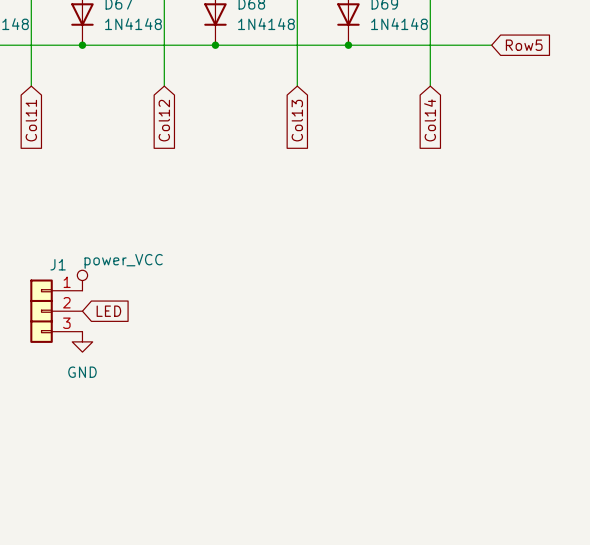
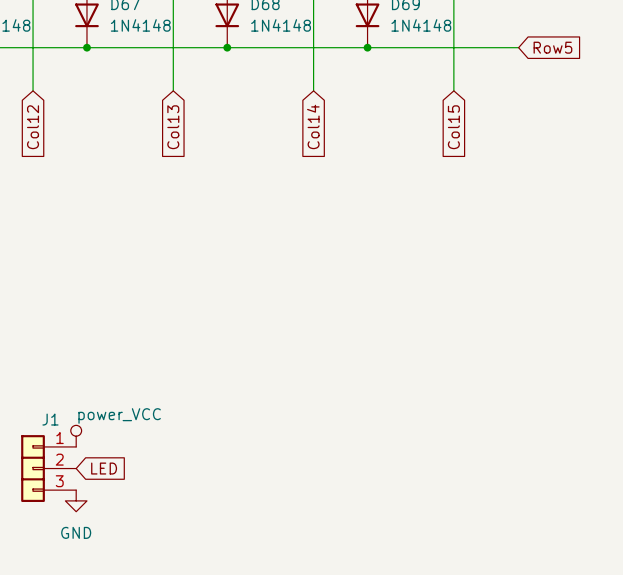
global label: Col11 (31, 120) -> Col12 (33, 127)
global label: Col12 (164, 120) -> Col13 (173, 127)
global label: Col13 (297, 120) -> Col14 (313, 126)
global label: Col14 (430, 120) -> Col15 (453, 127)
power symbol position: power_VCC (82, 280) -> power_VCC (76, 436)
J1 position: (56, 311) -> (48, 468)
global label position: LED (108, 311) -> LED (104, 468)
power symbol position: GND (82, 341) -> GND (76, 500)

